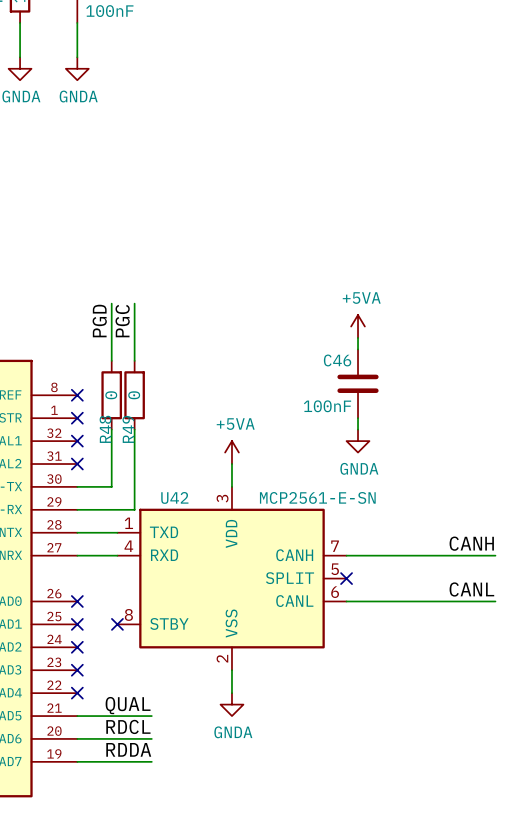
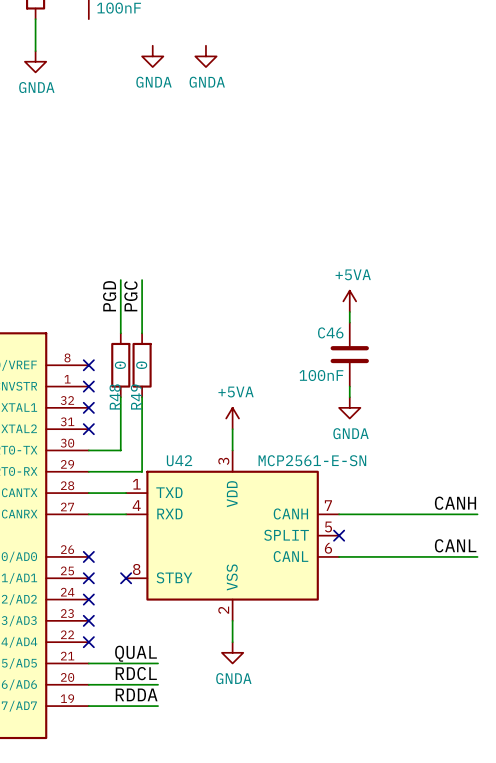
wire: (77, 22) (77, 57) -> none
power symbol: none -> GNDA (152, 56)
power symbol: none -> GNDA (205, 56)
power symbol: GNDA (77, 68) -> none

